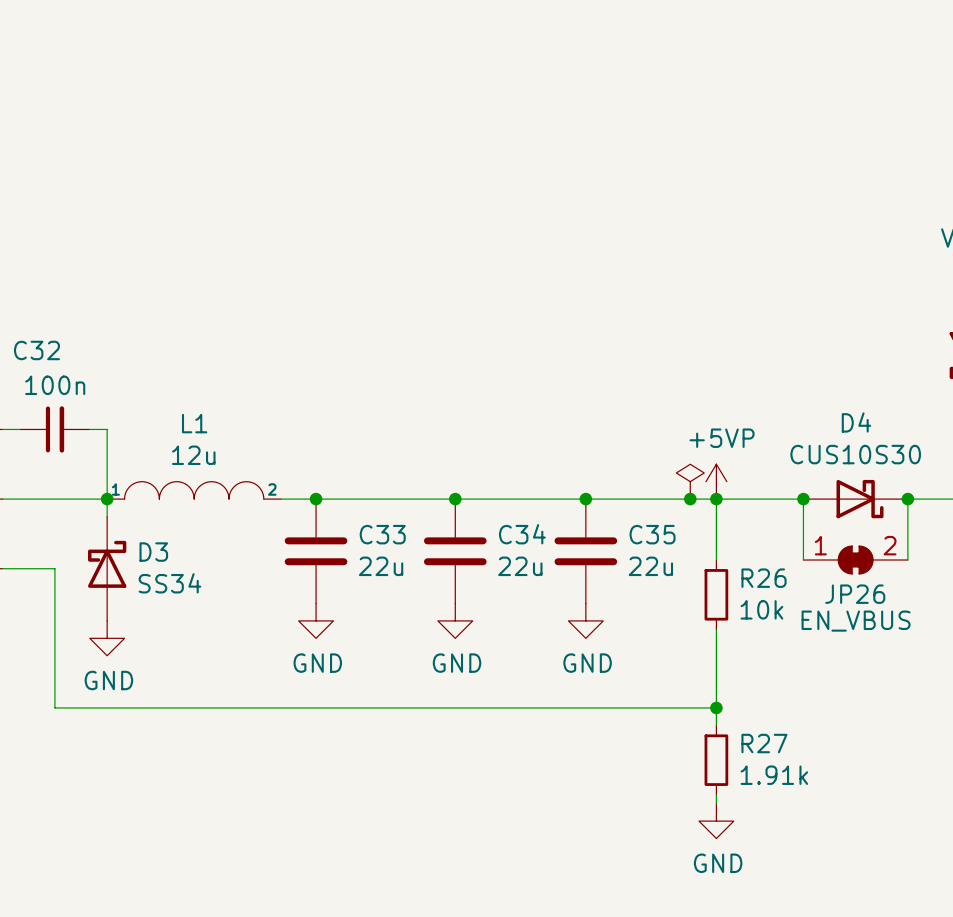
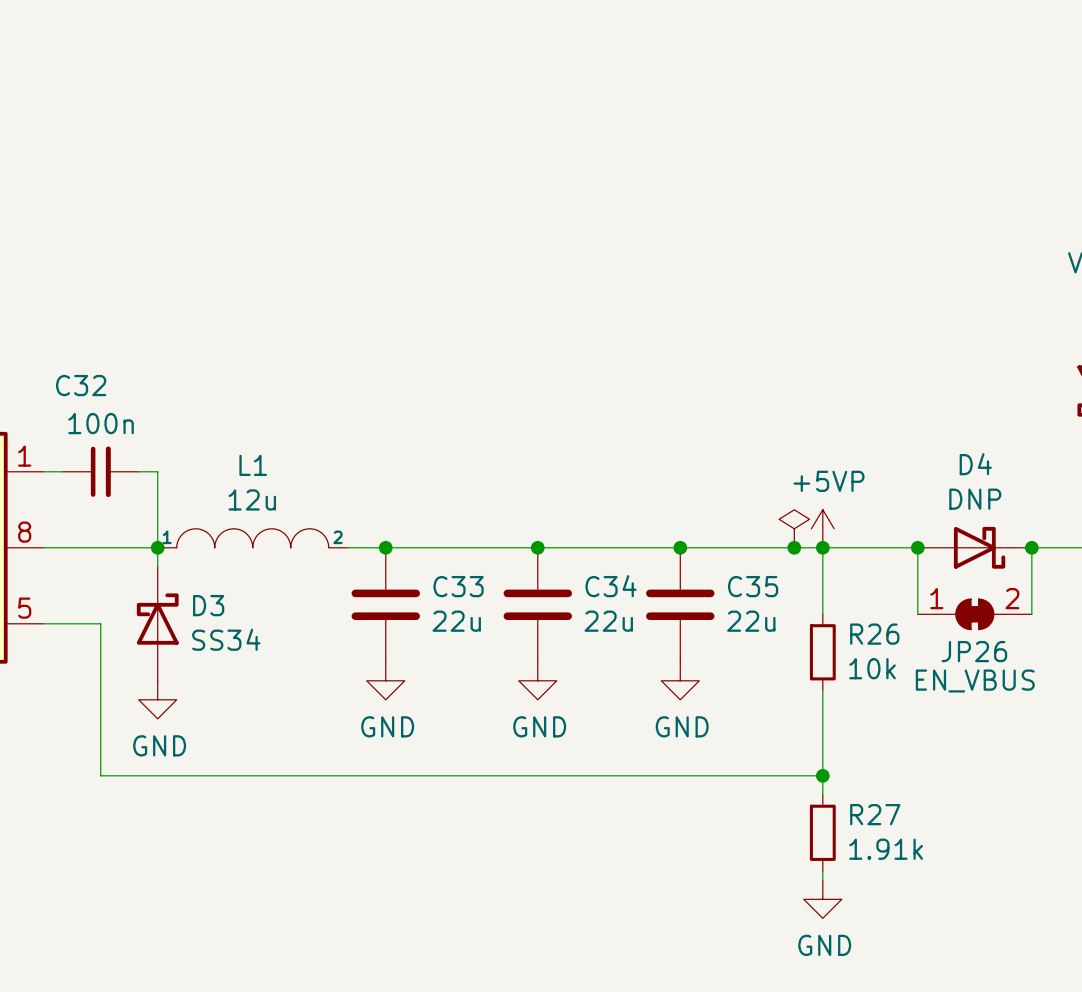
D4 value: CUS10S30 (855, 454) -> DNP (975, 499)

